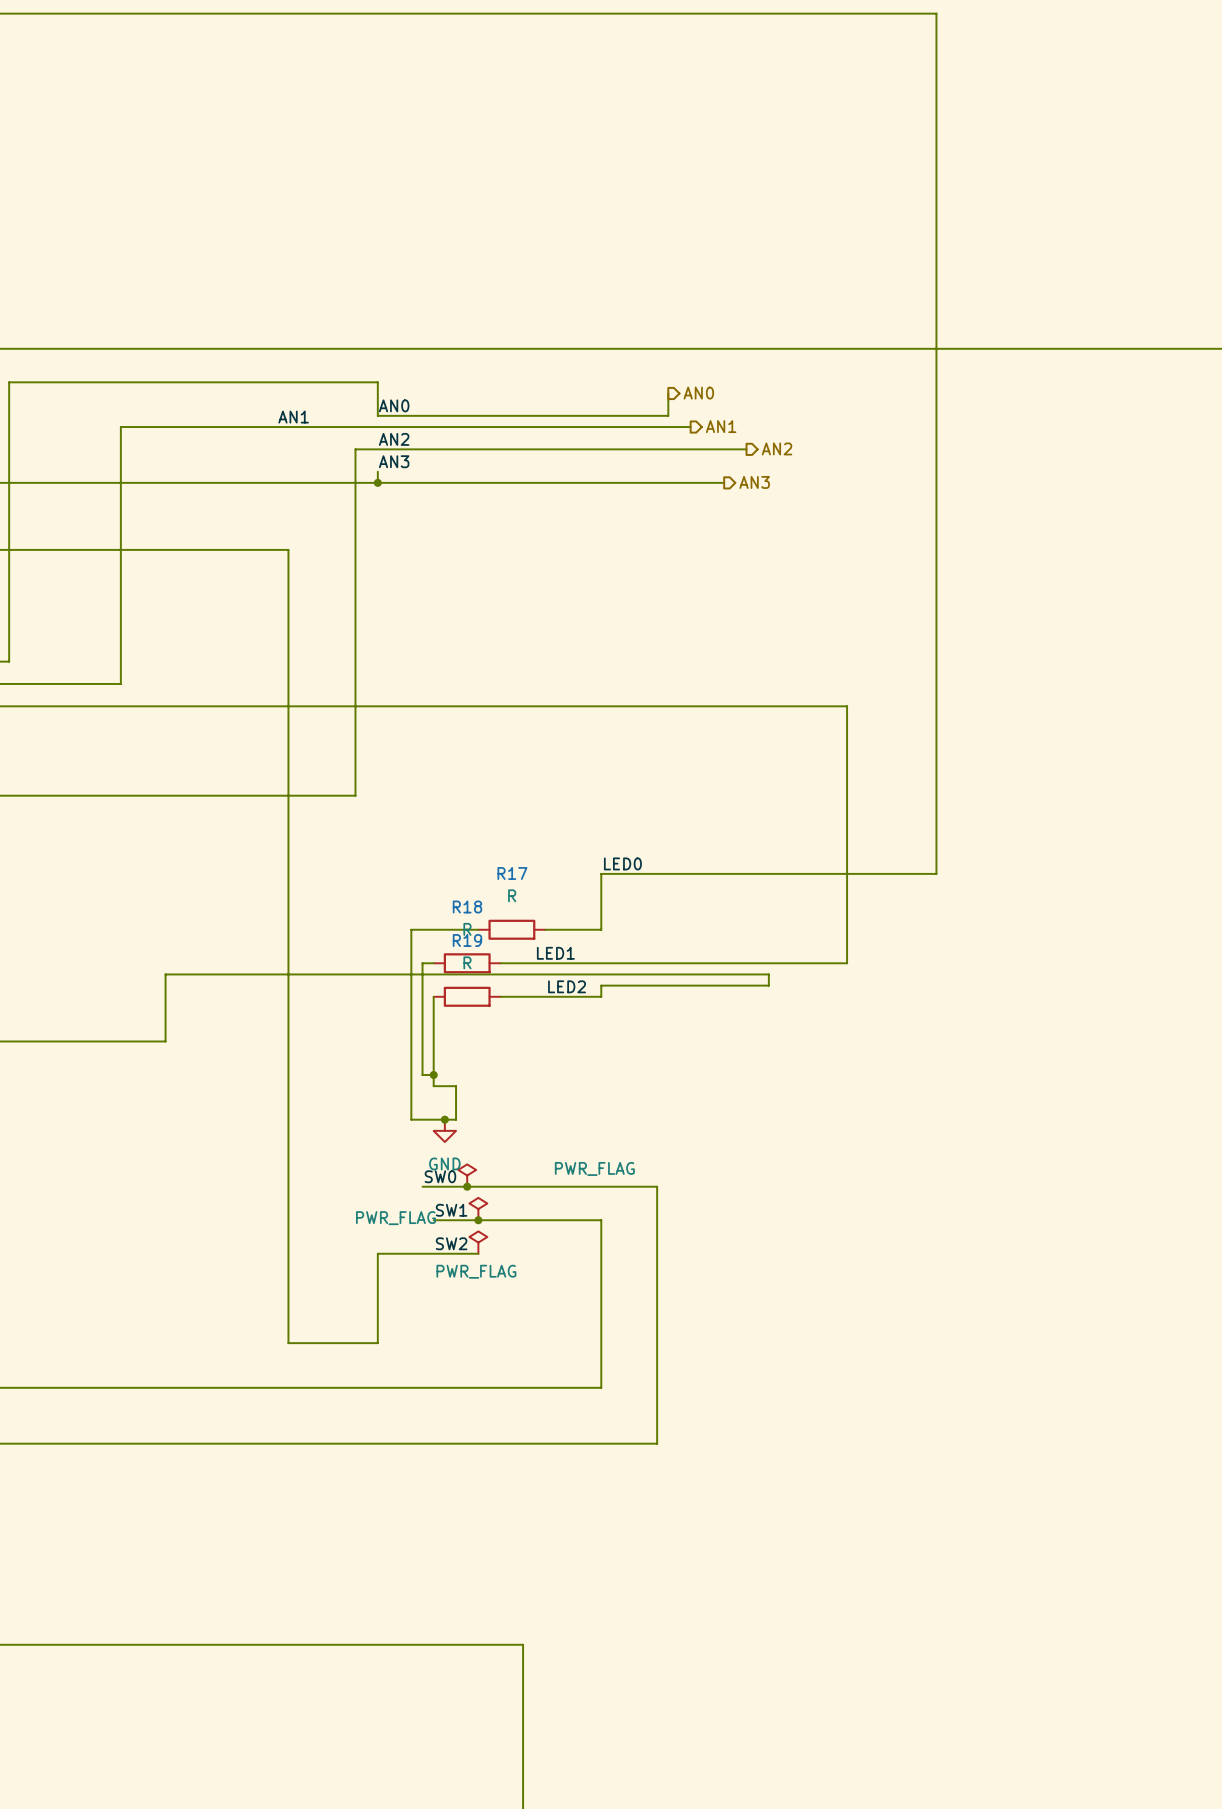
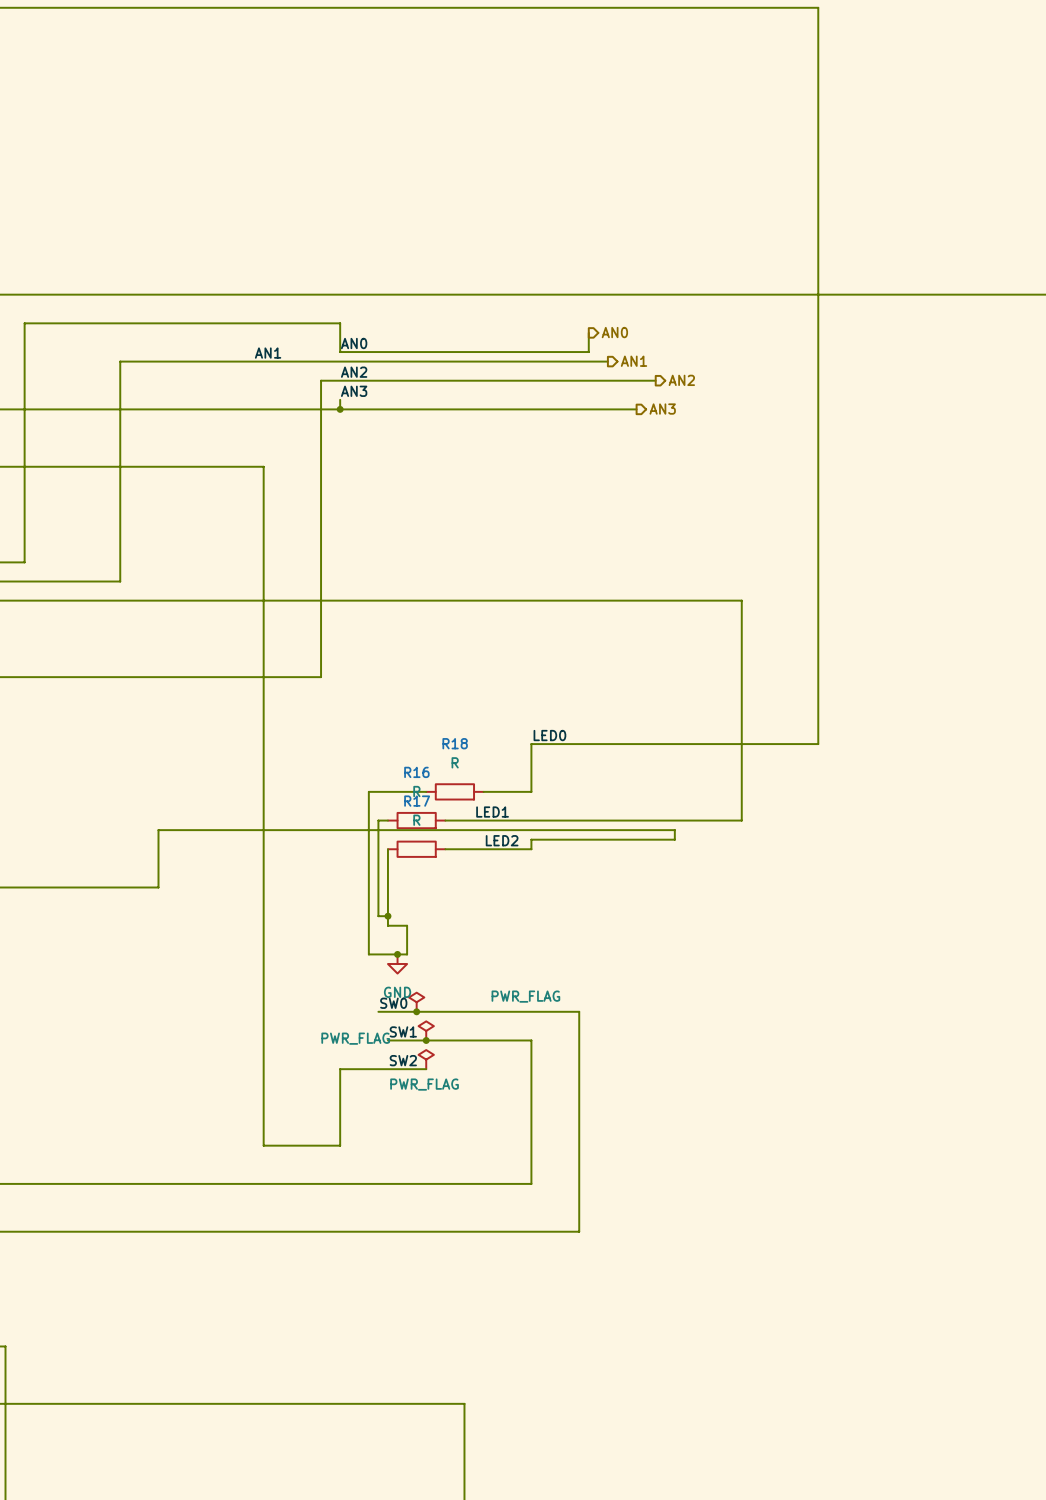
R17 name: R17 (512, 873) -> R18 (455, 743)
R18 name: R18 (467, 907) -> R16 (416, 772)
R19 name: R19 (467, 940) -> R17 (417, 801)

